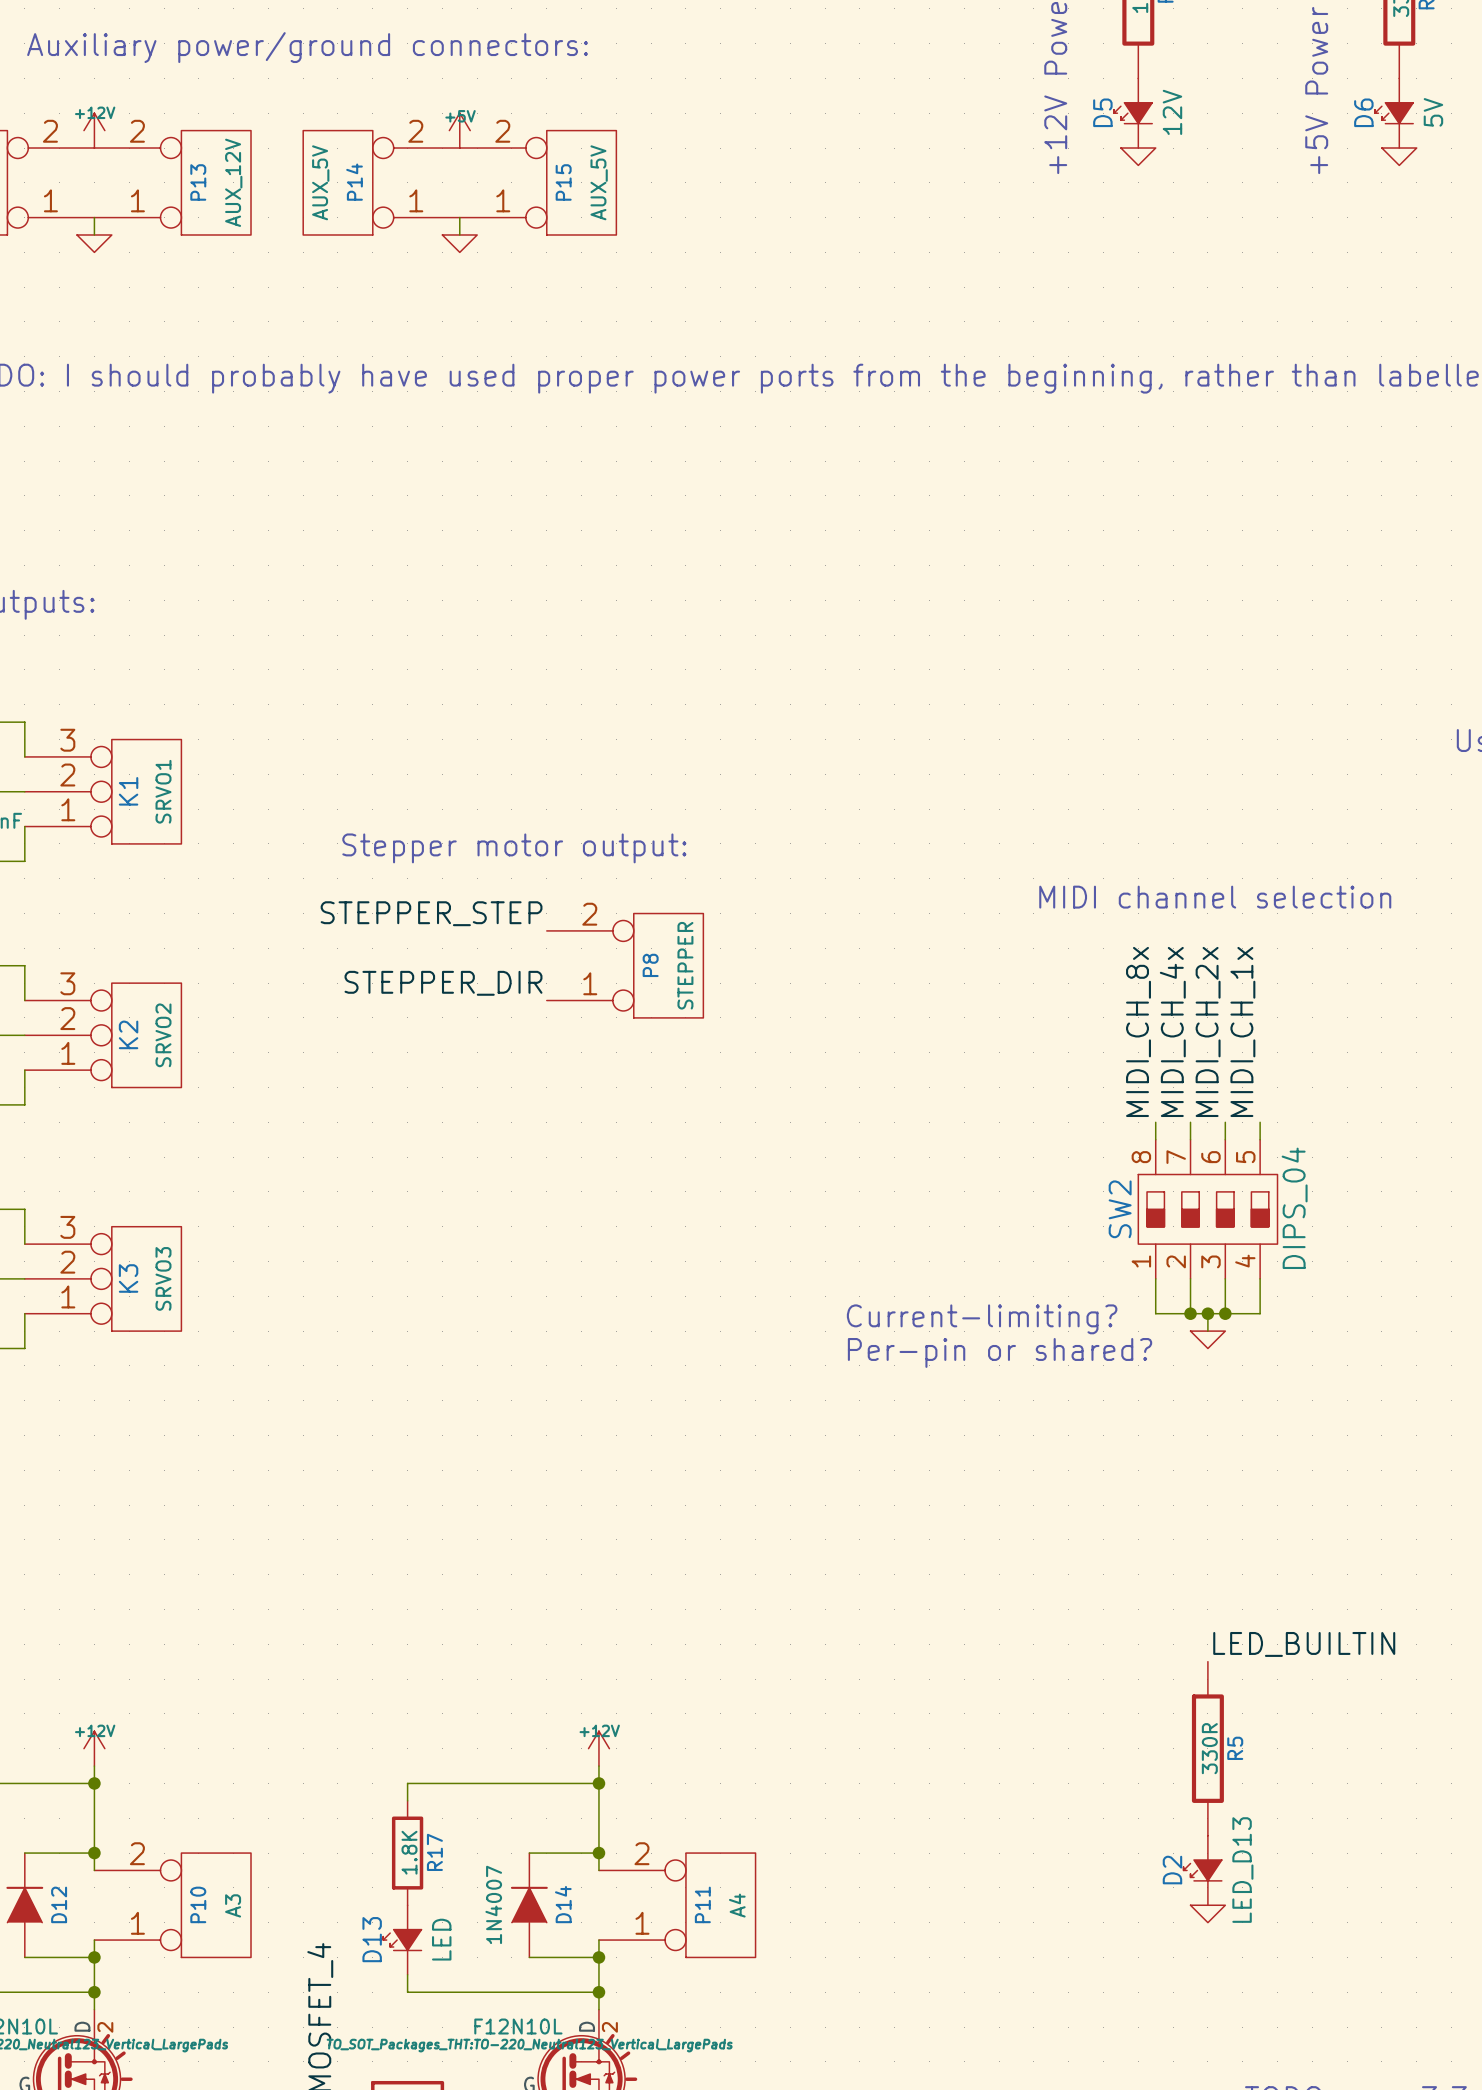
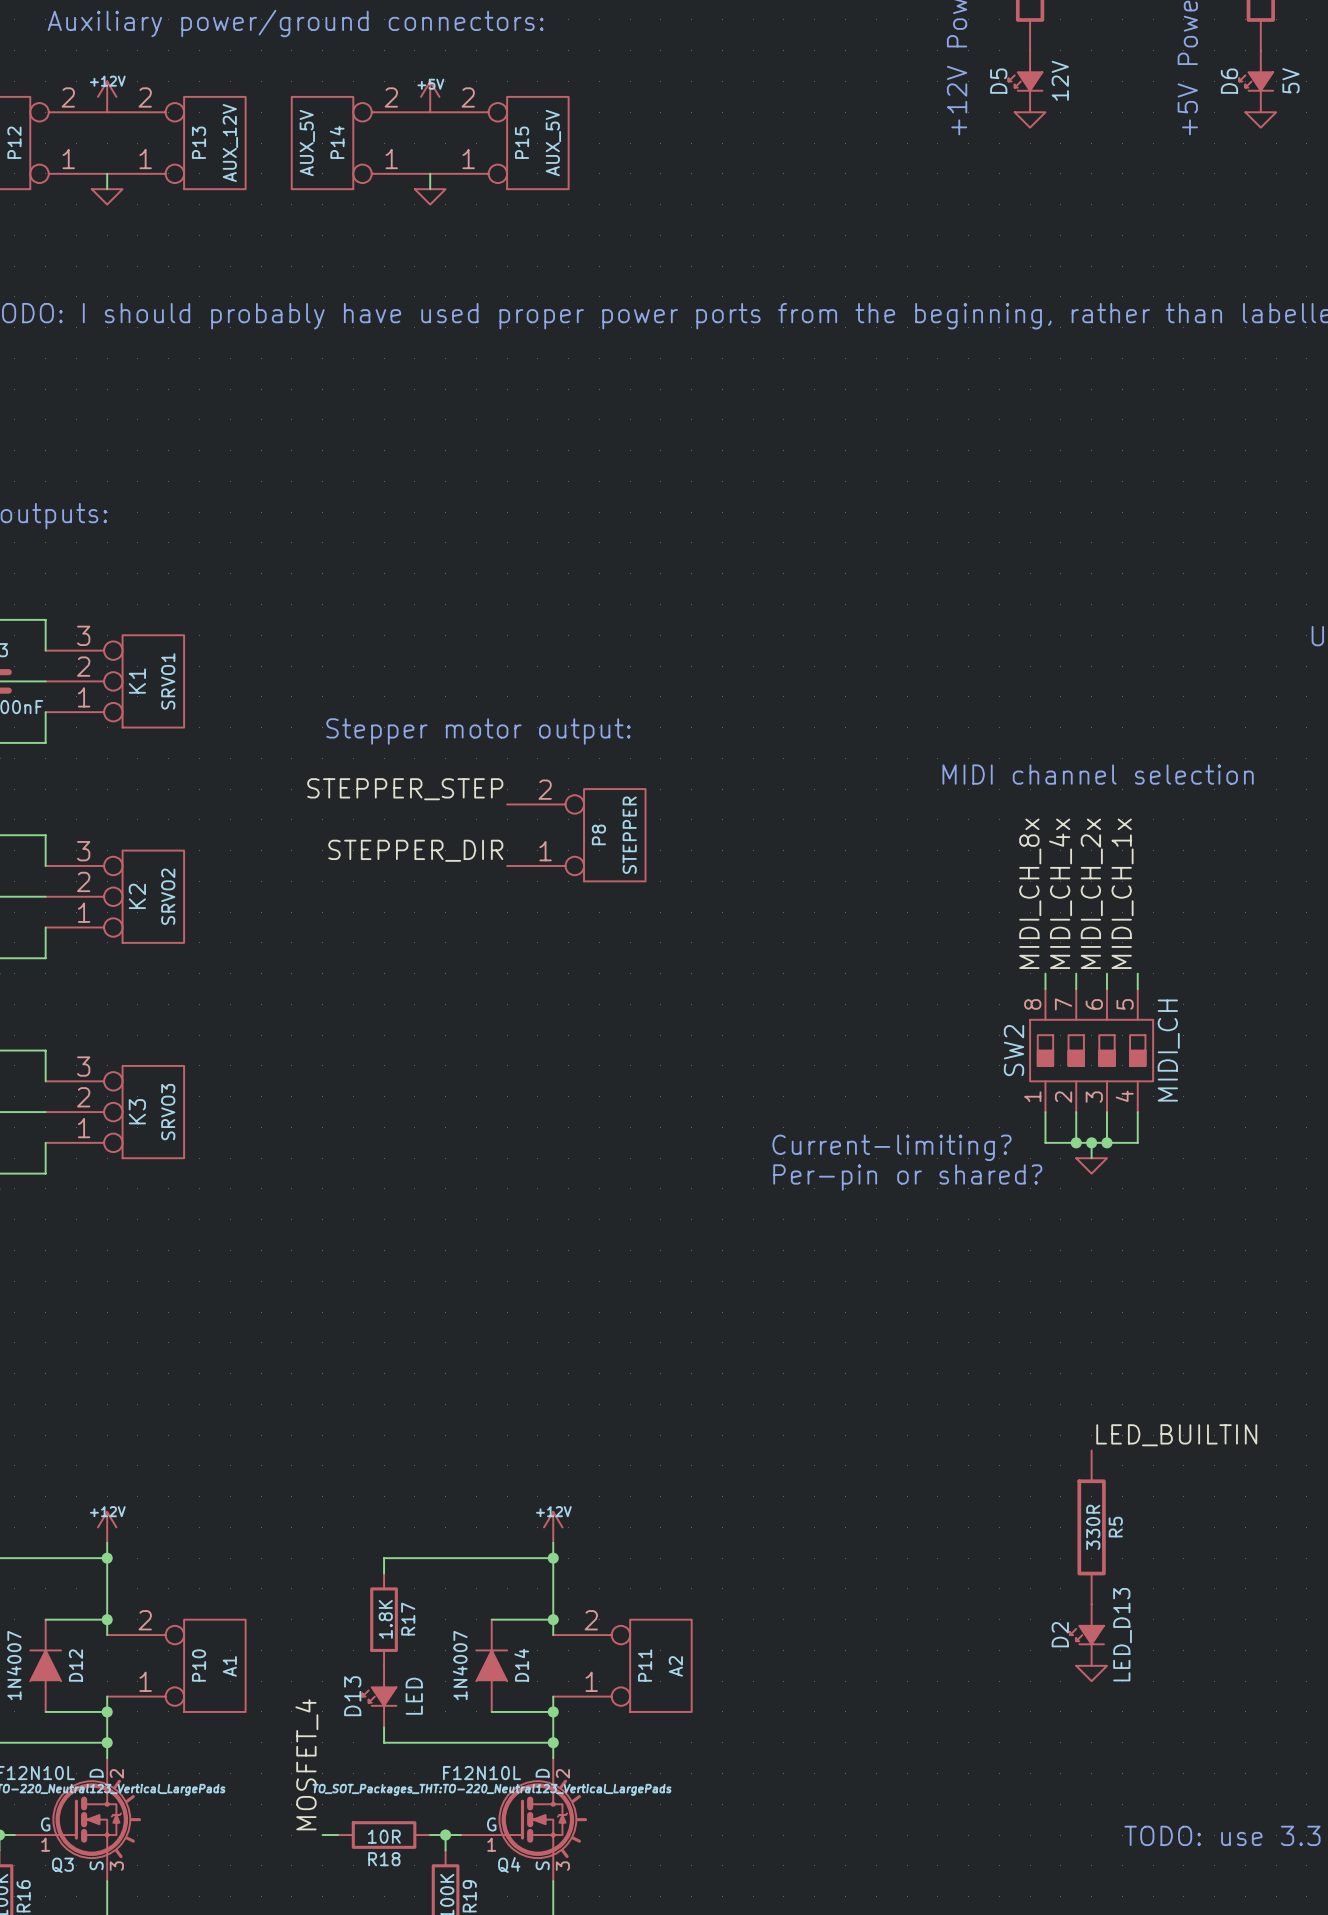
SW2 value: DIPS_04 (1294, 1208) -> MIDI_CH (1168, 1050)
P10 value: A3 (233, 1905) -> A1 (229, 1666)
P11 value: A4 (737, 1905) -> A2 (675, 1666)

